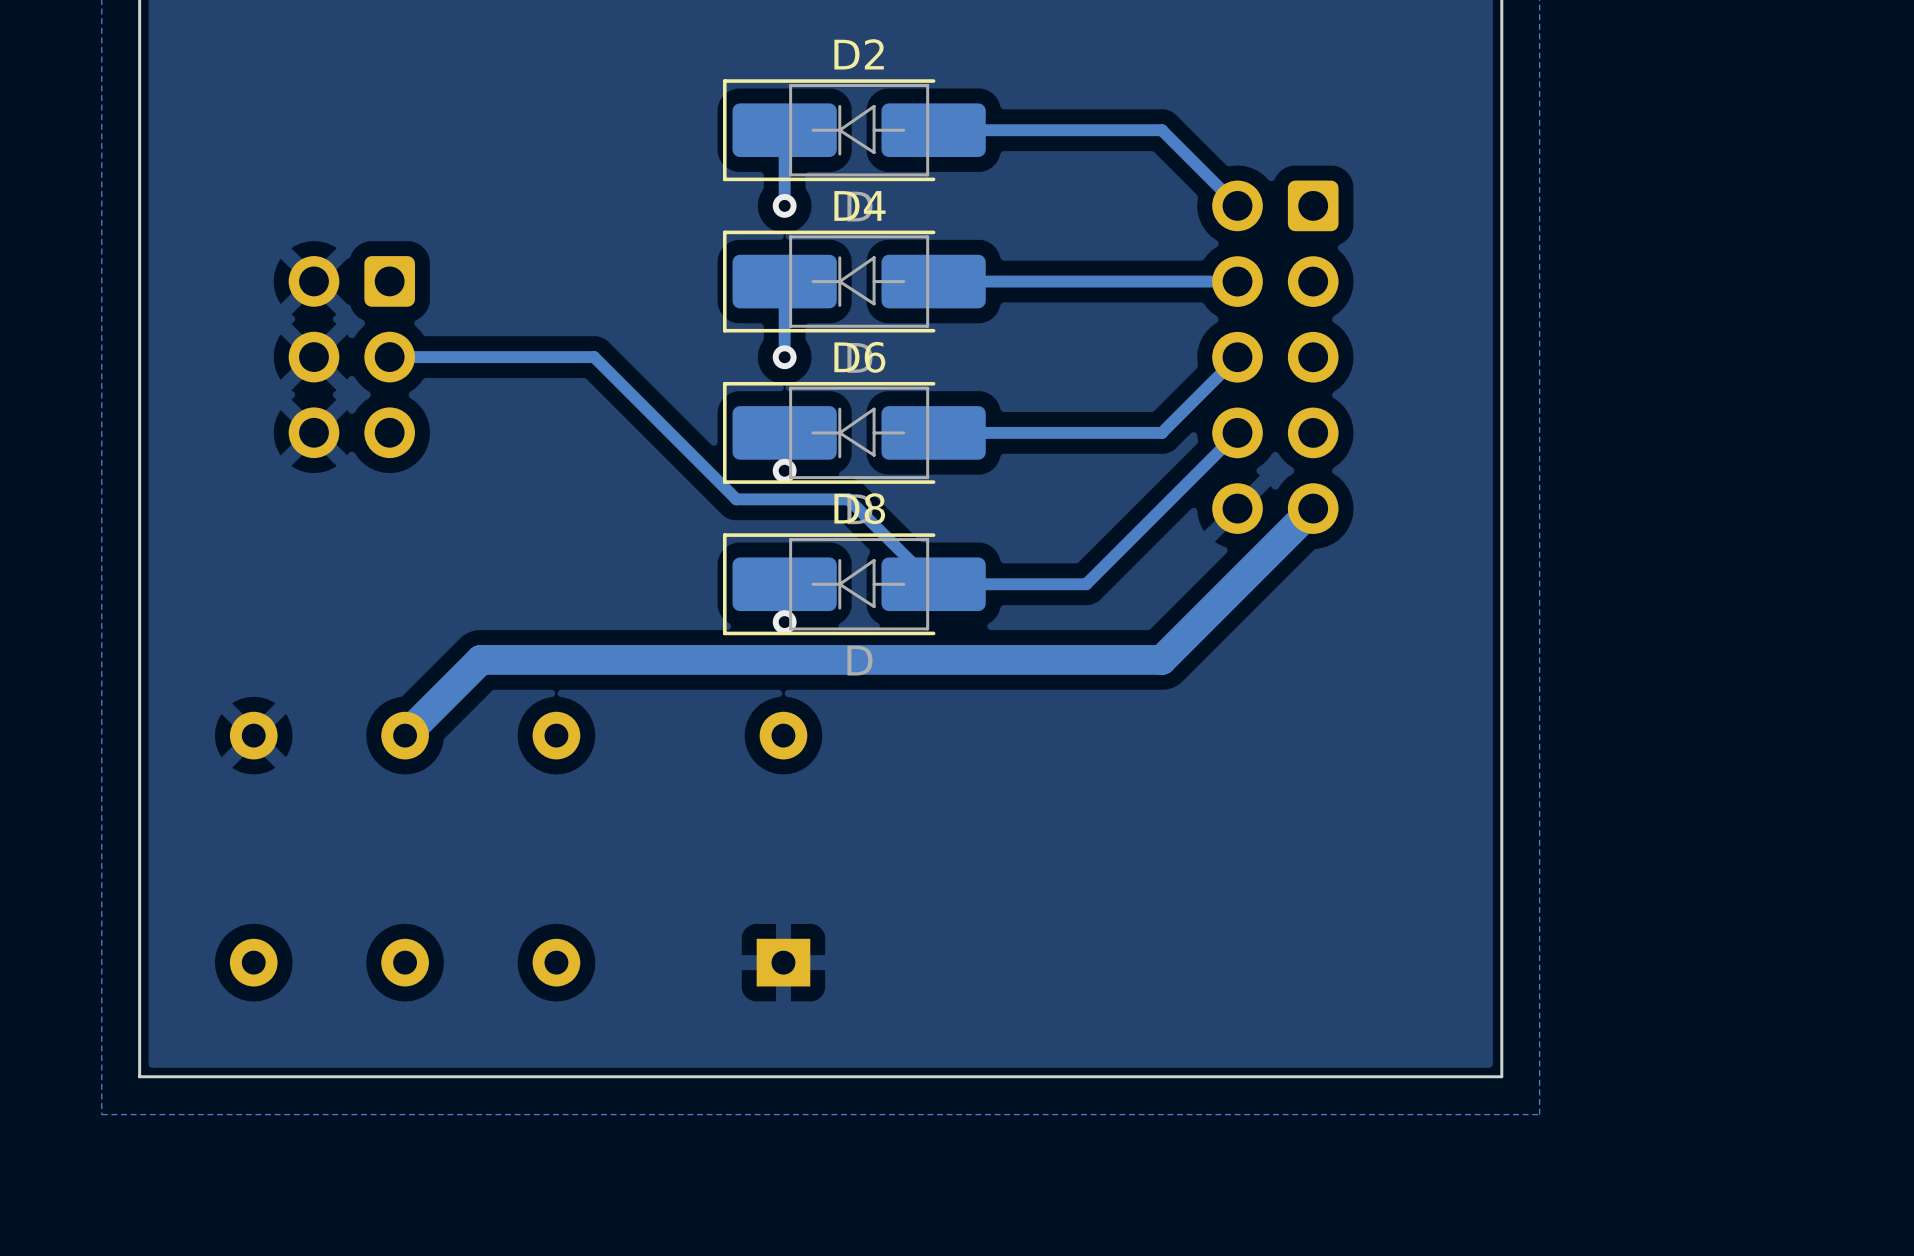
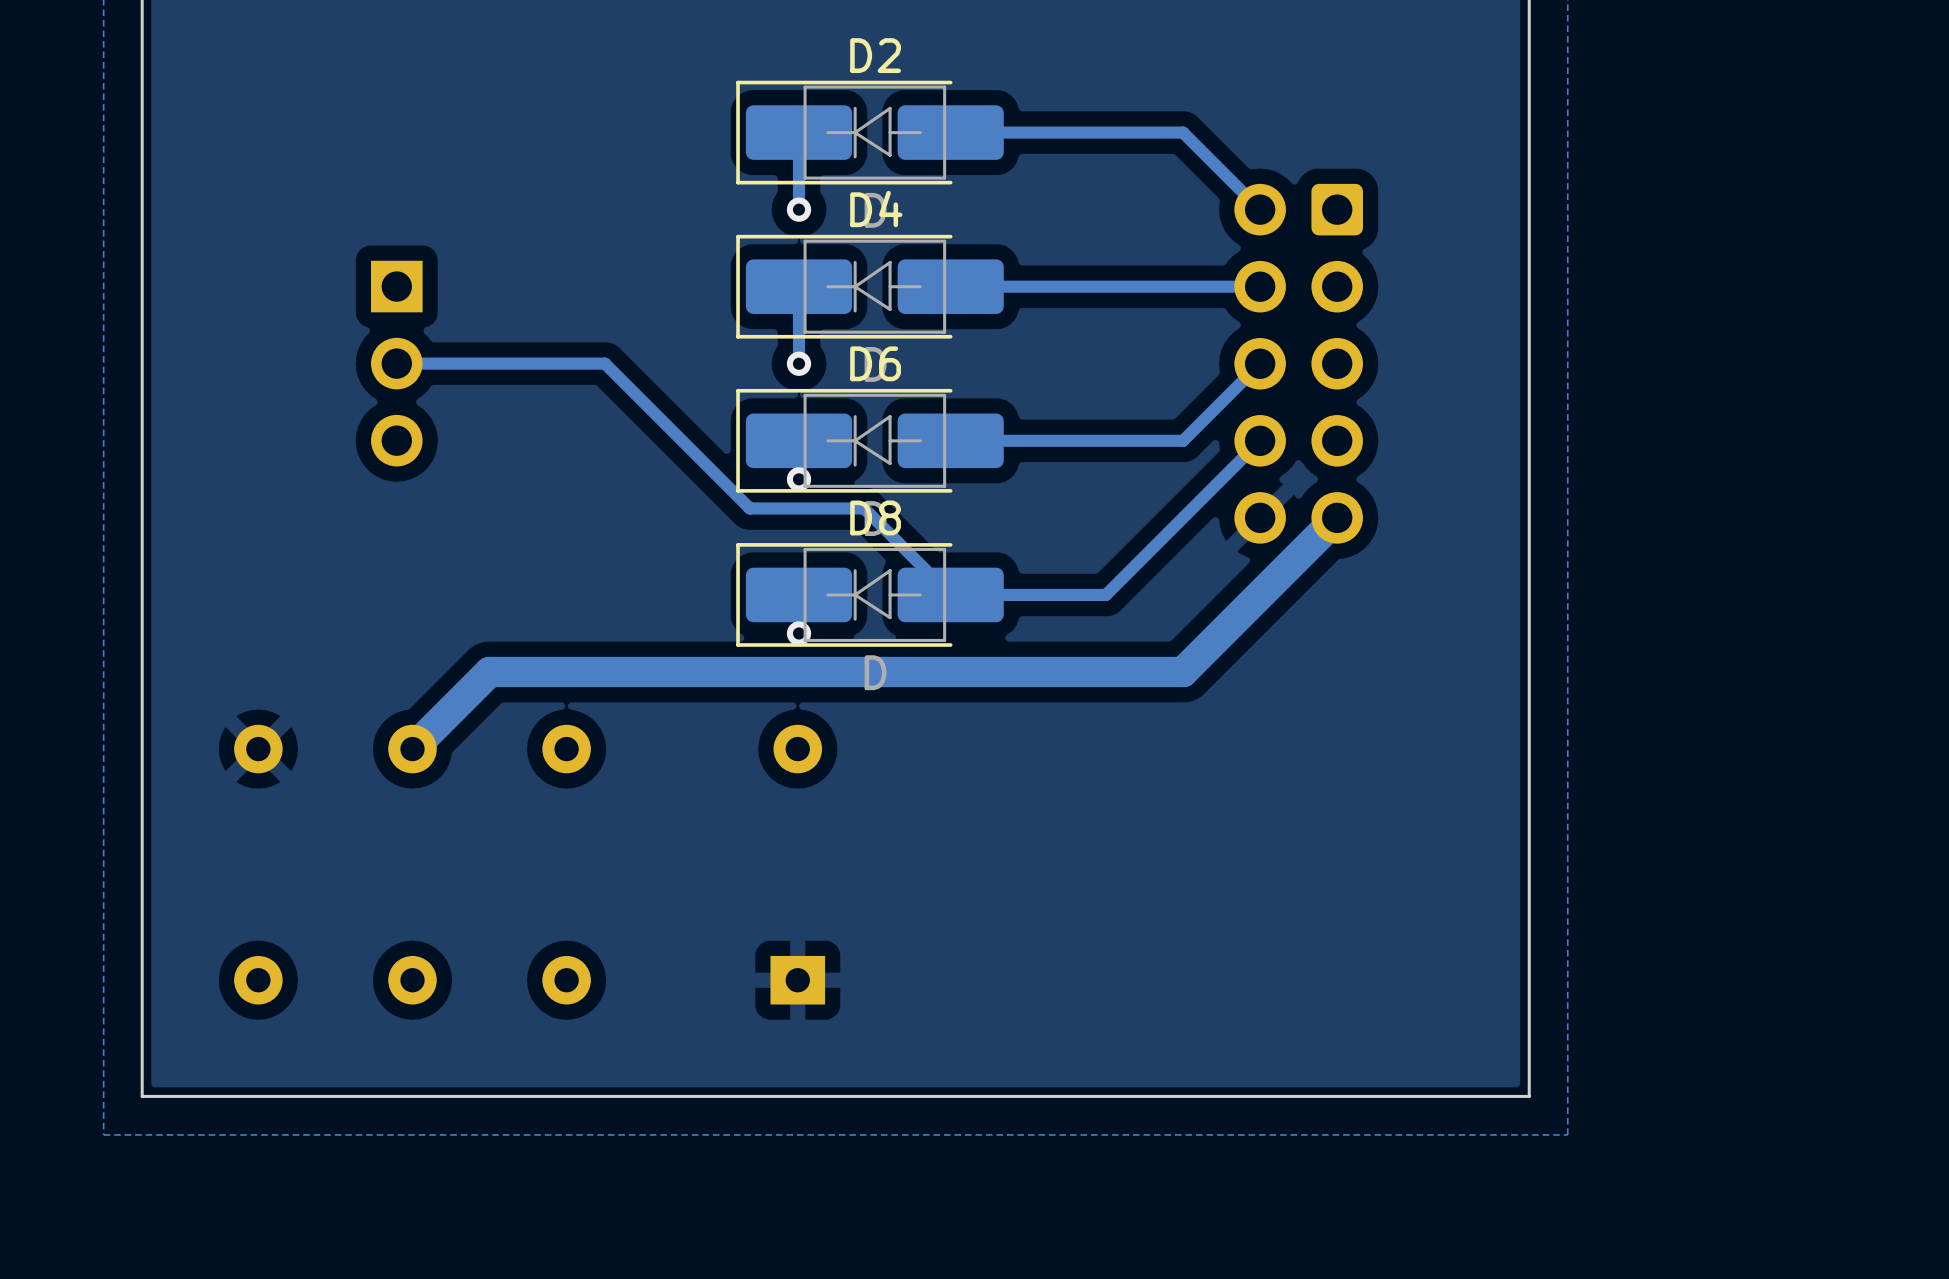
part: (351, 357) -> none
part: none -> (396, 363)

